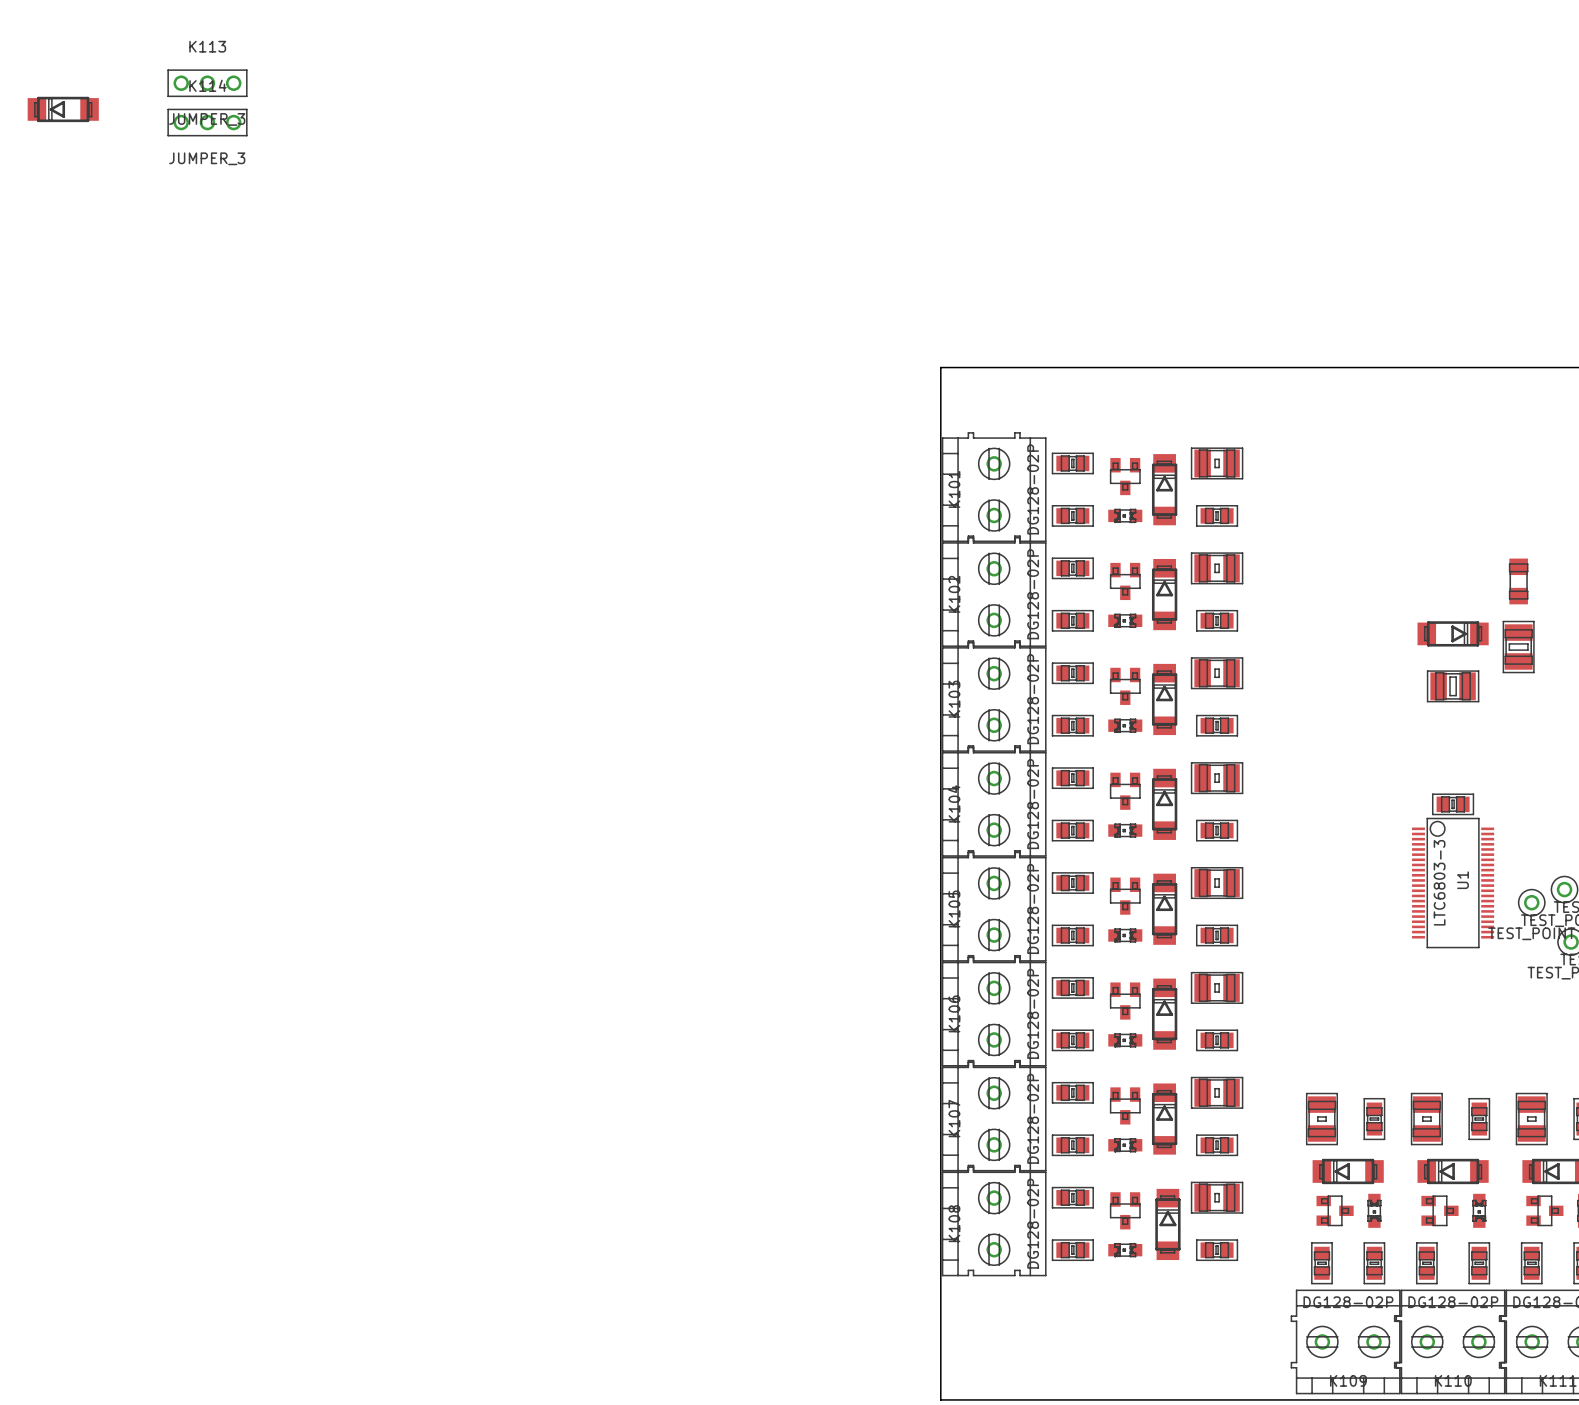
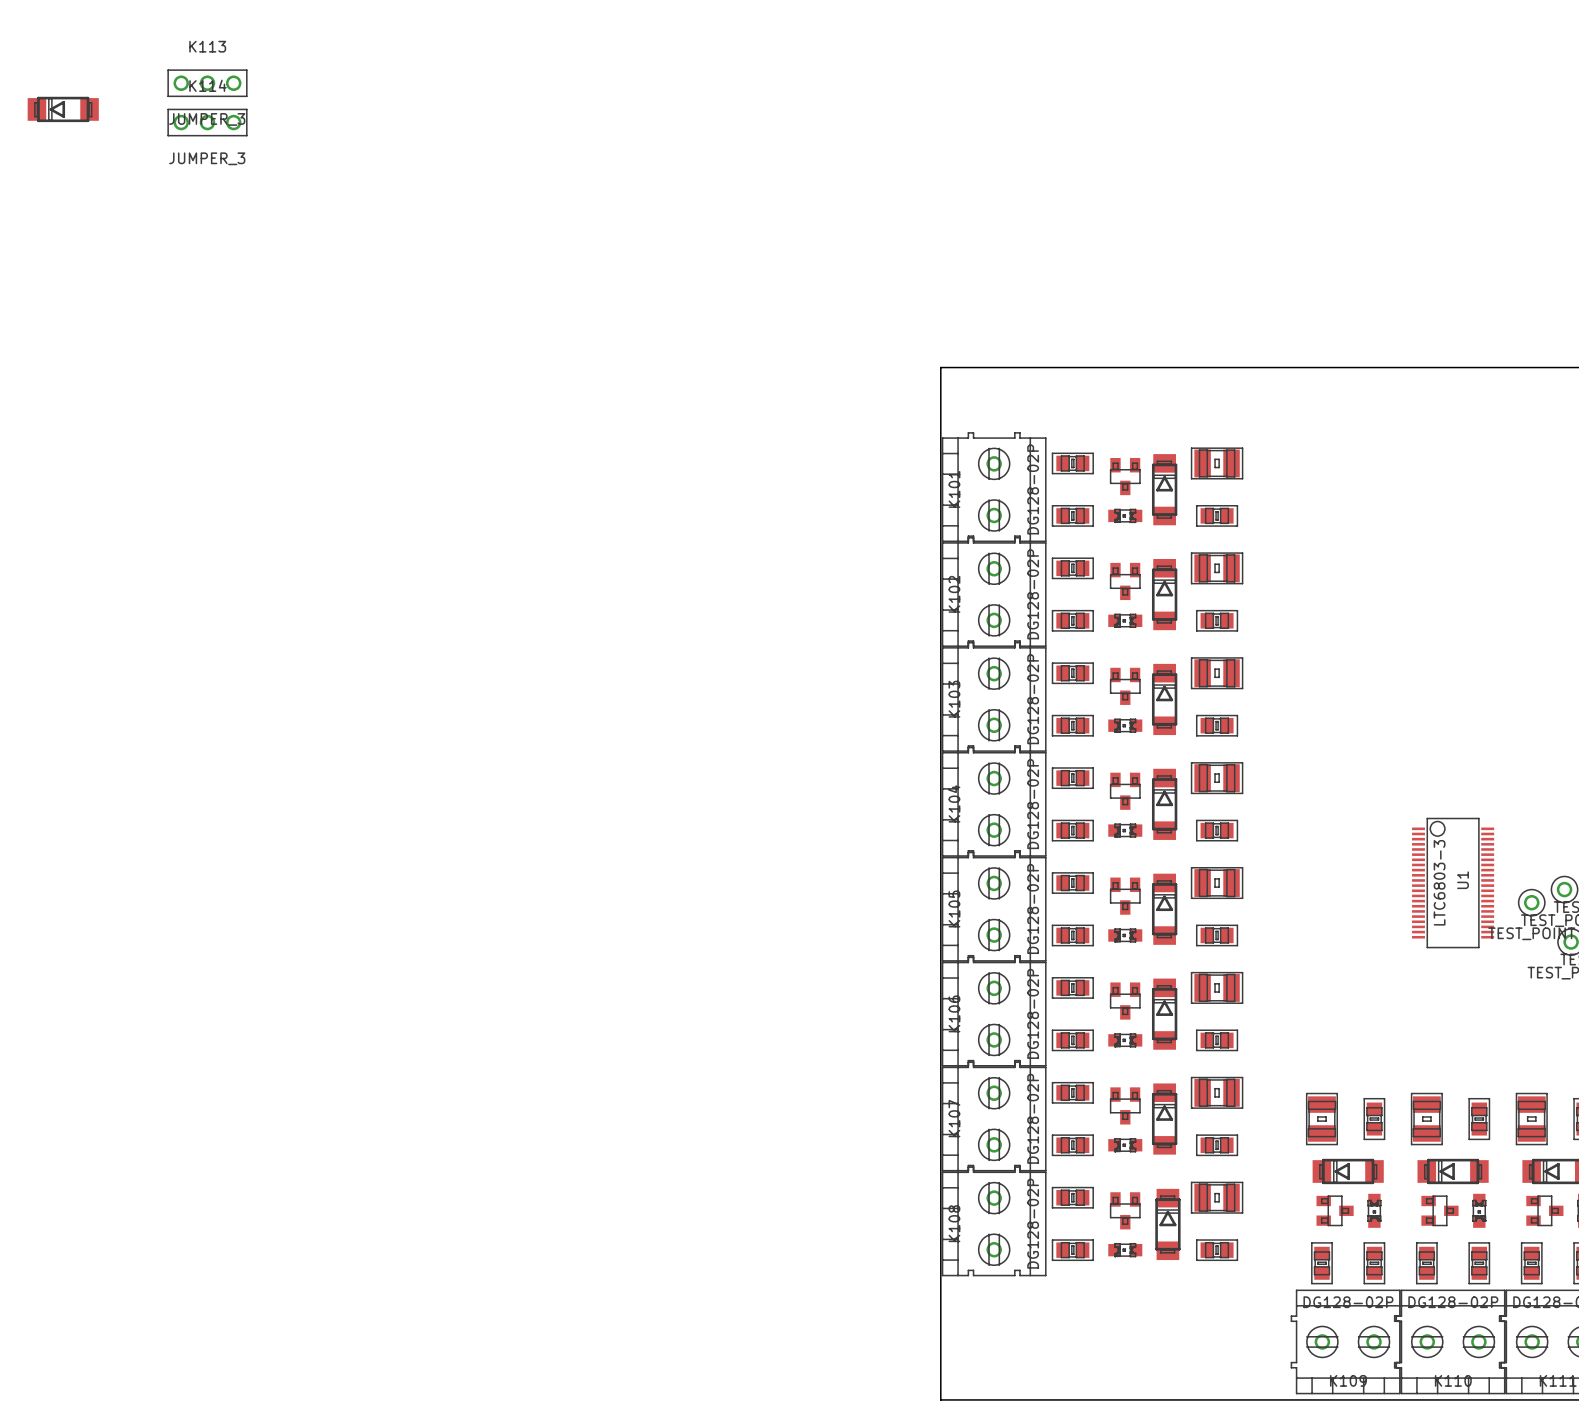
part: (1518, 581) -> none
part: (1453, 633) -> none
part: (1518, 647) -> none
part: (1453, 686) -> none
part: (1453, 804) -> none

